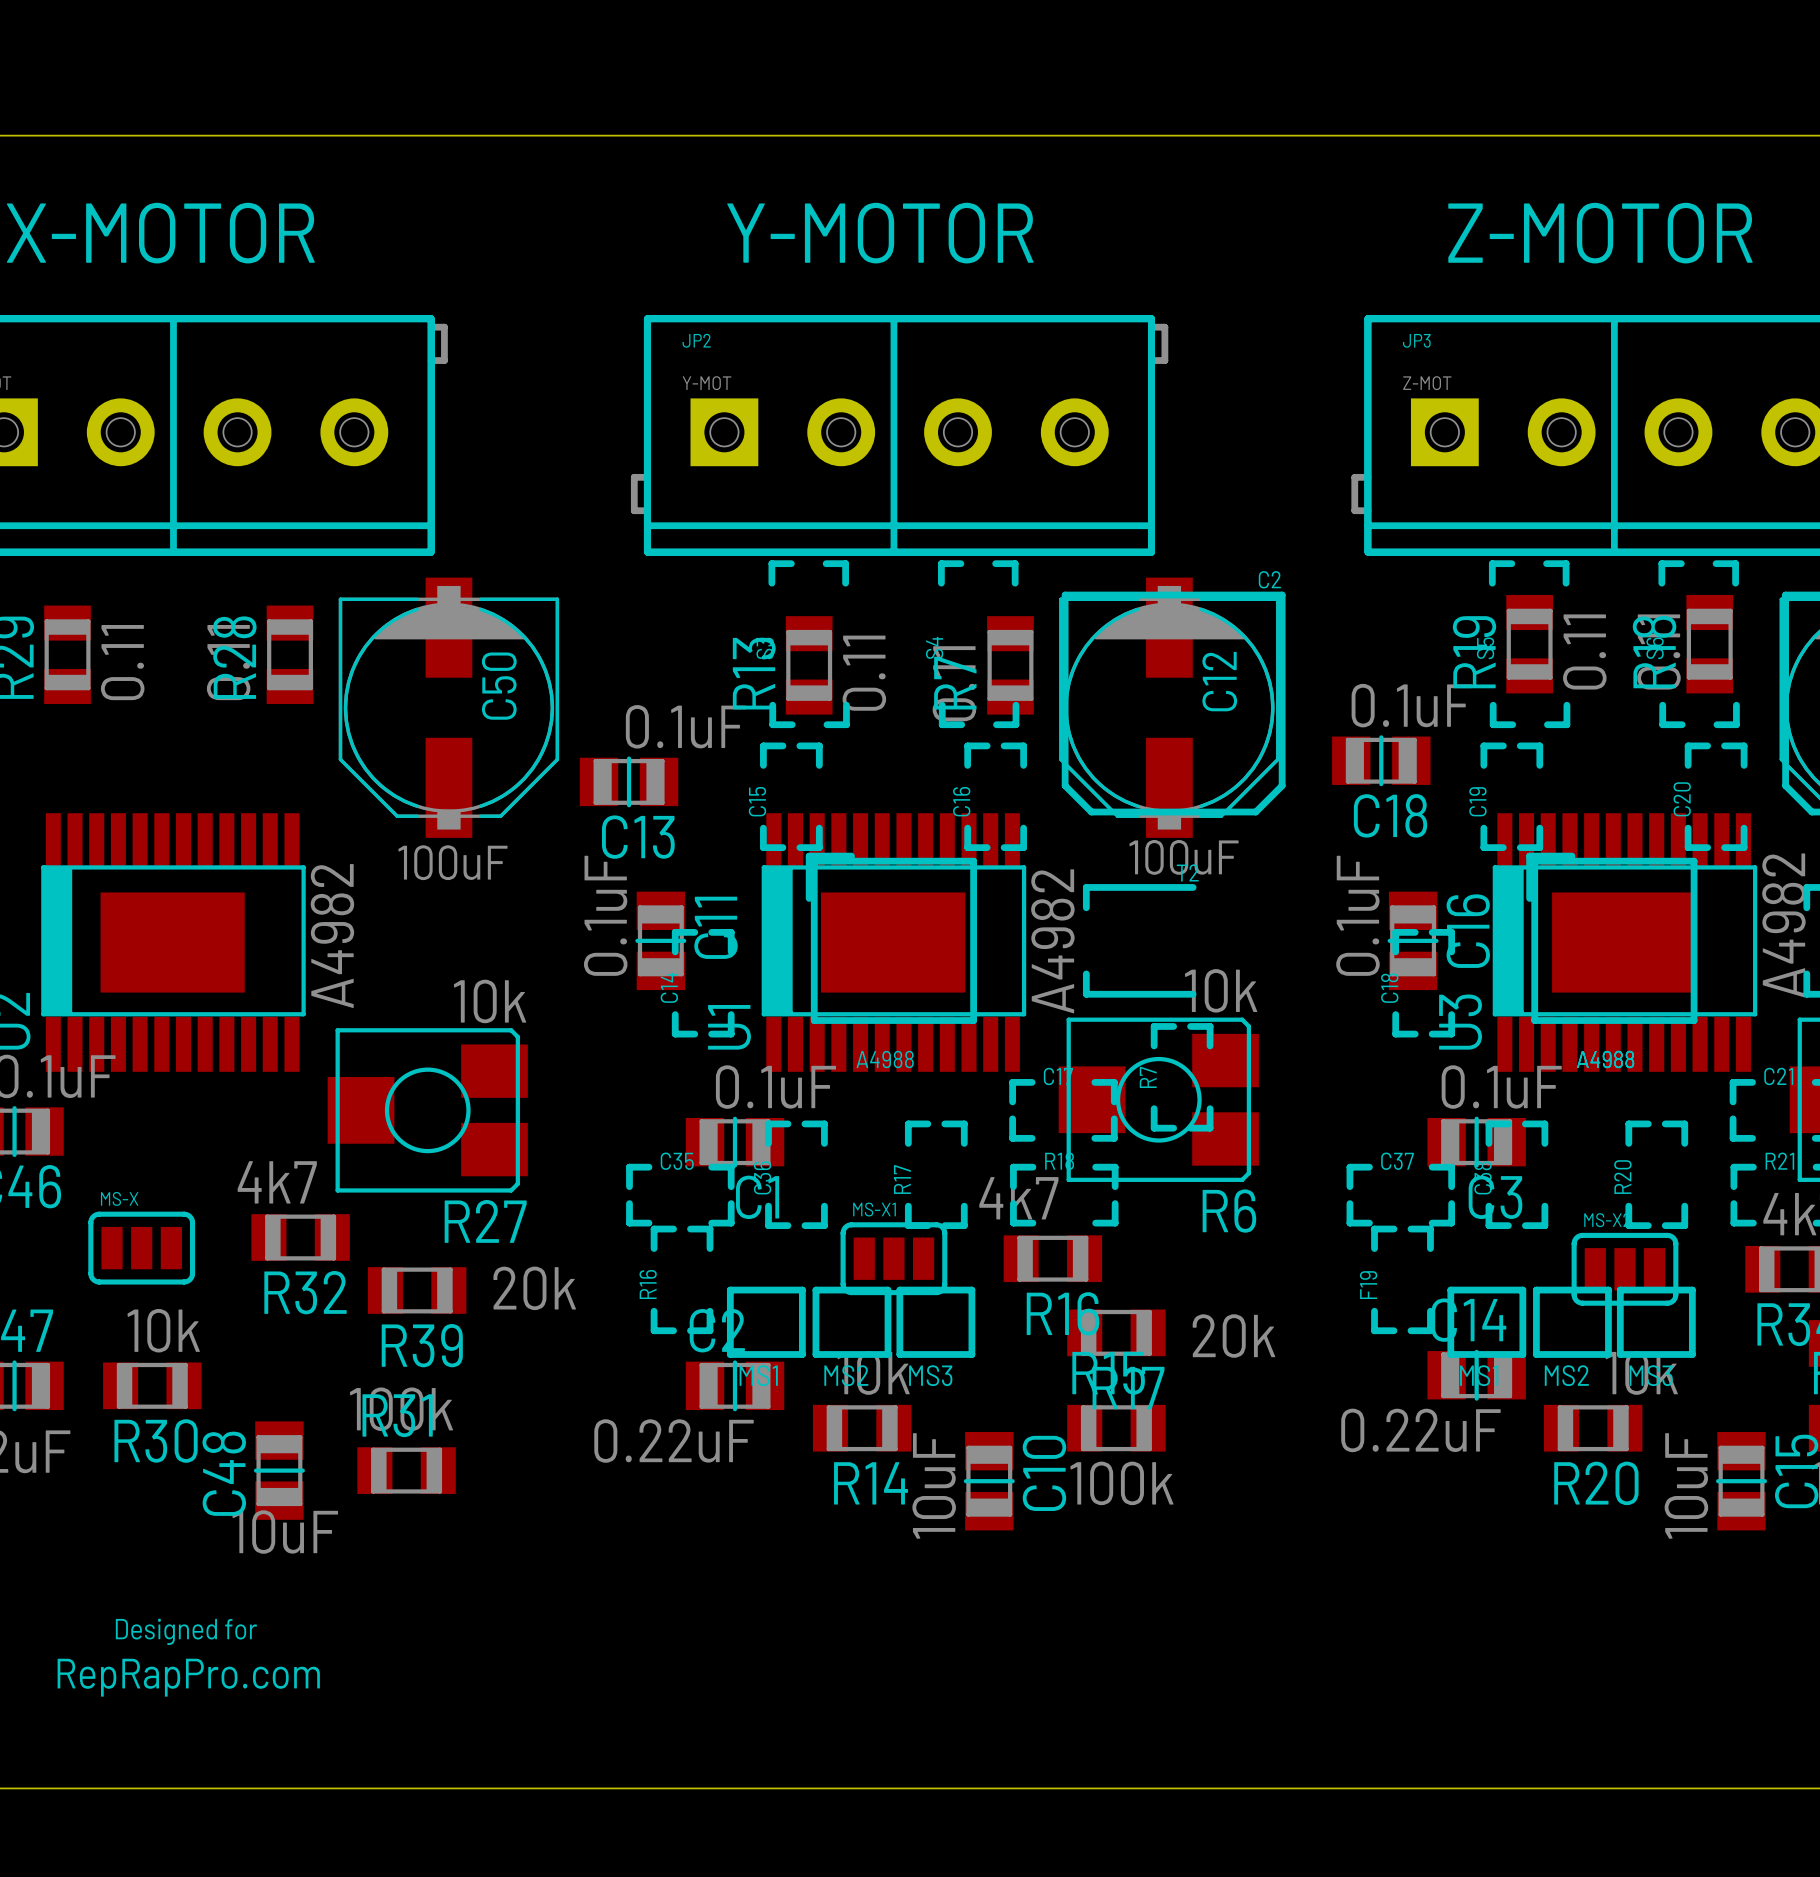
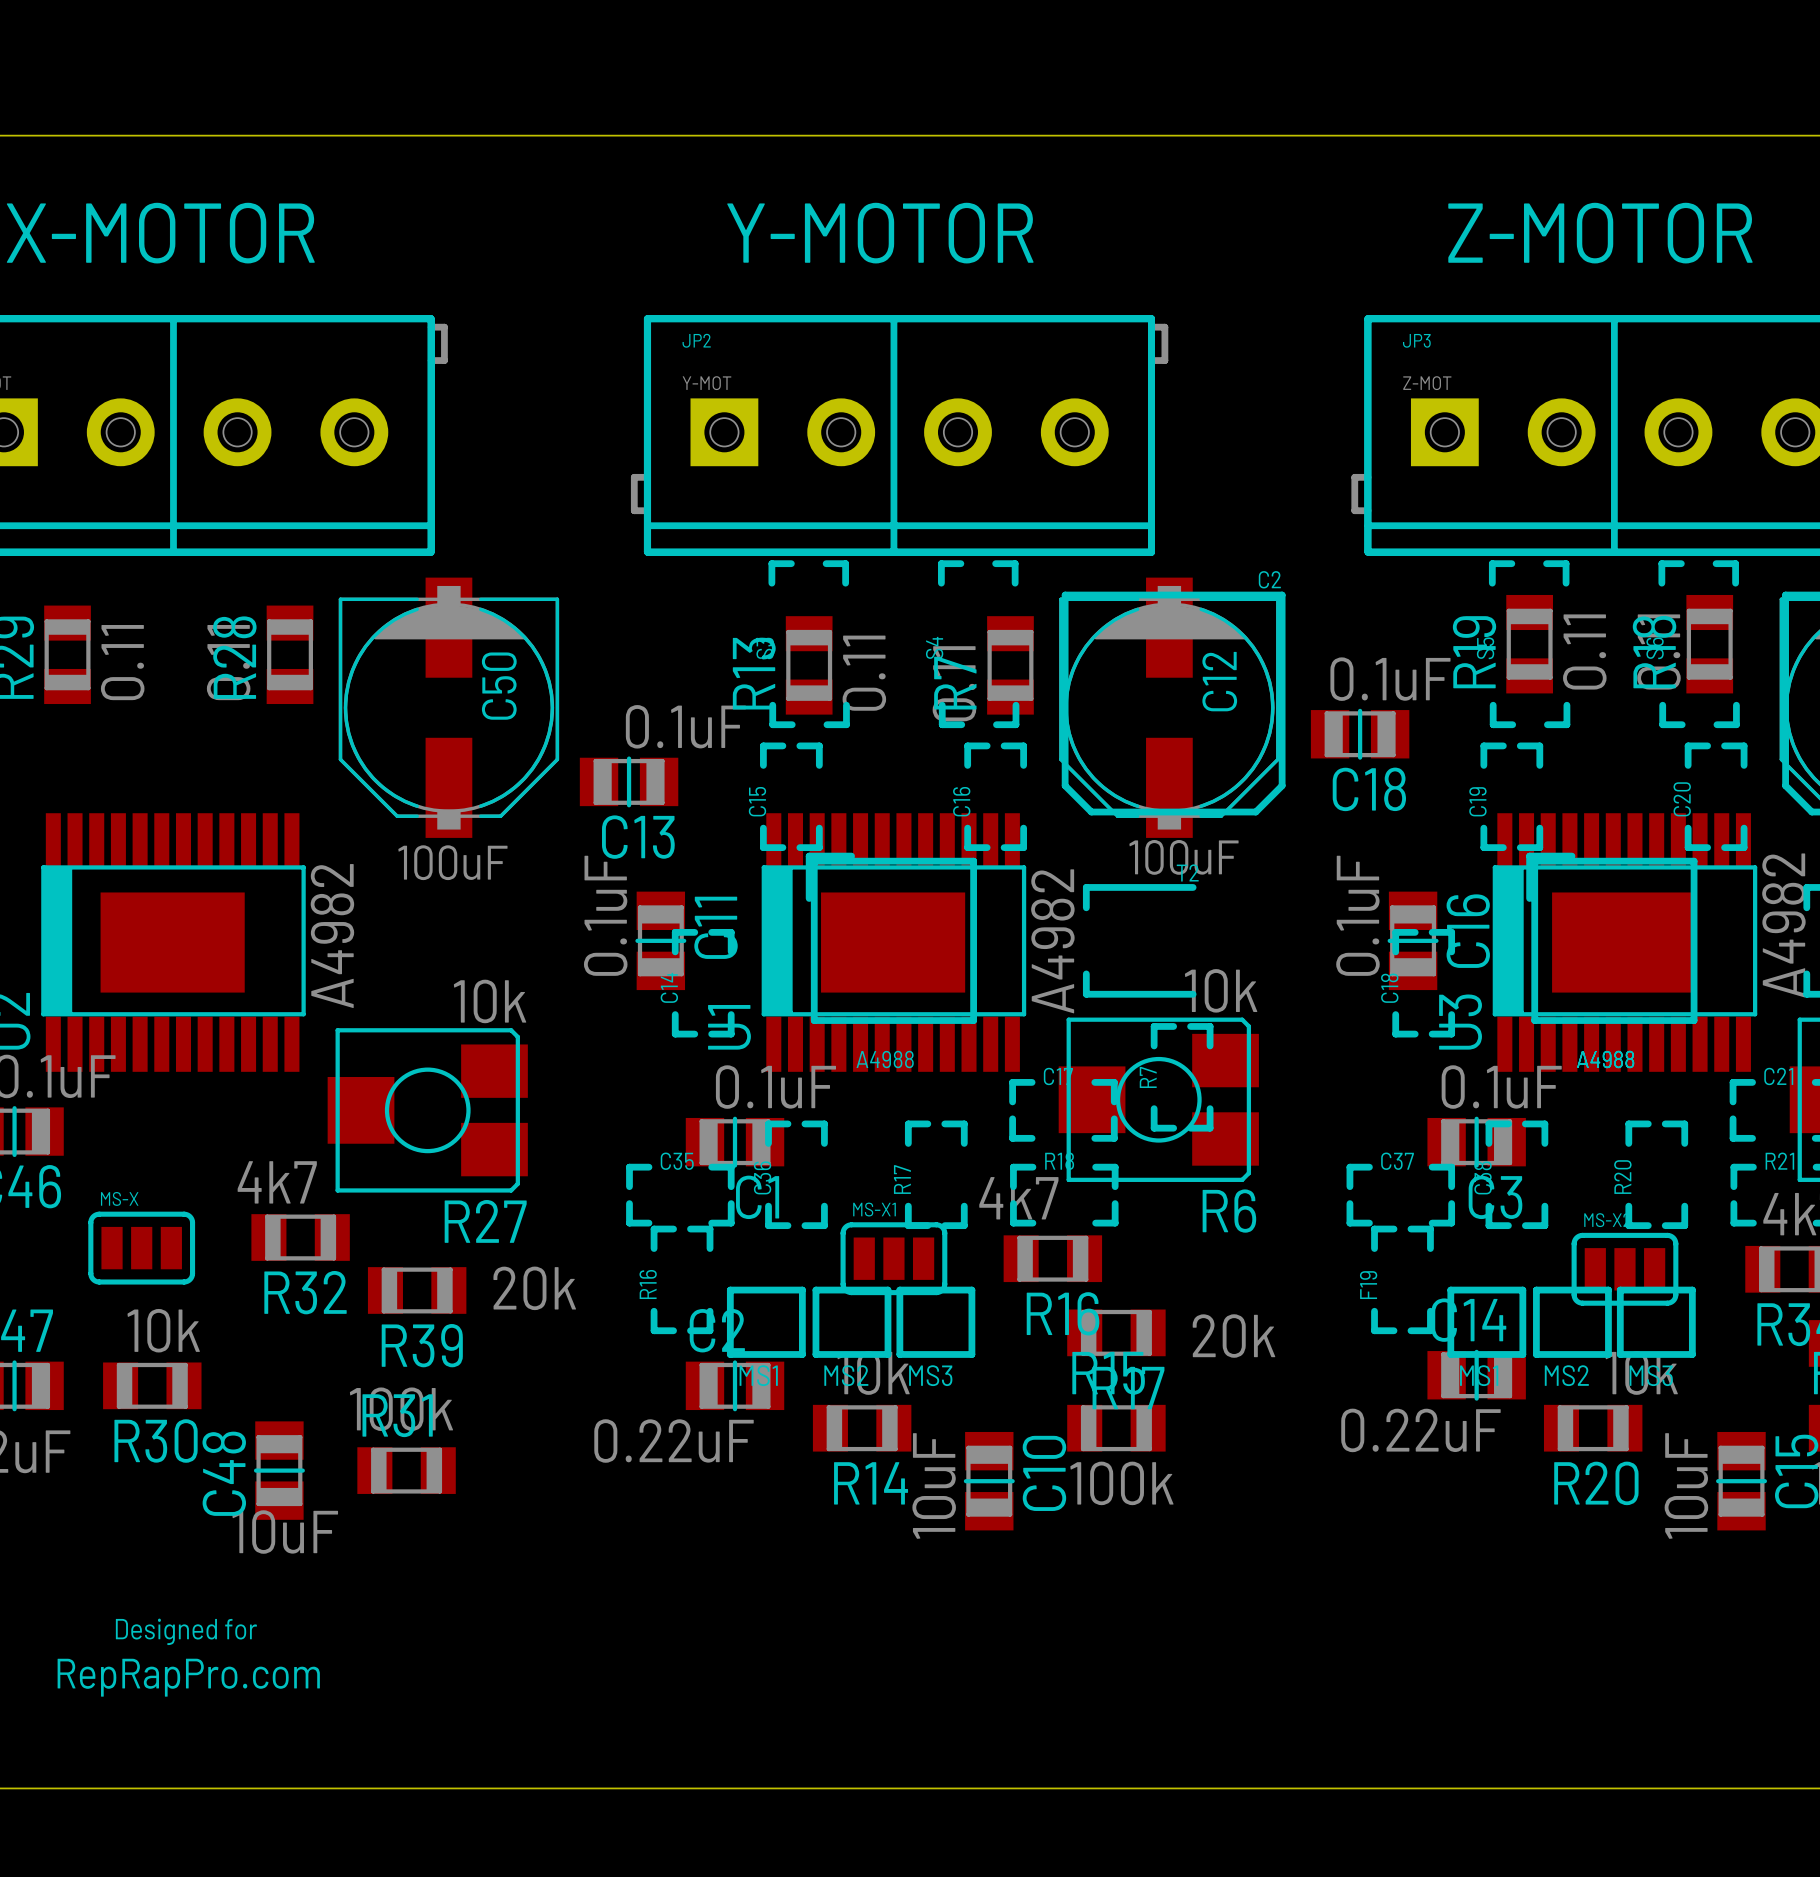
C18 position: (1381, 760) -> (1360, 734)

